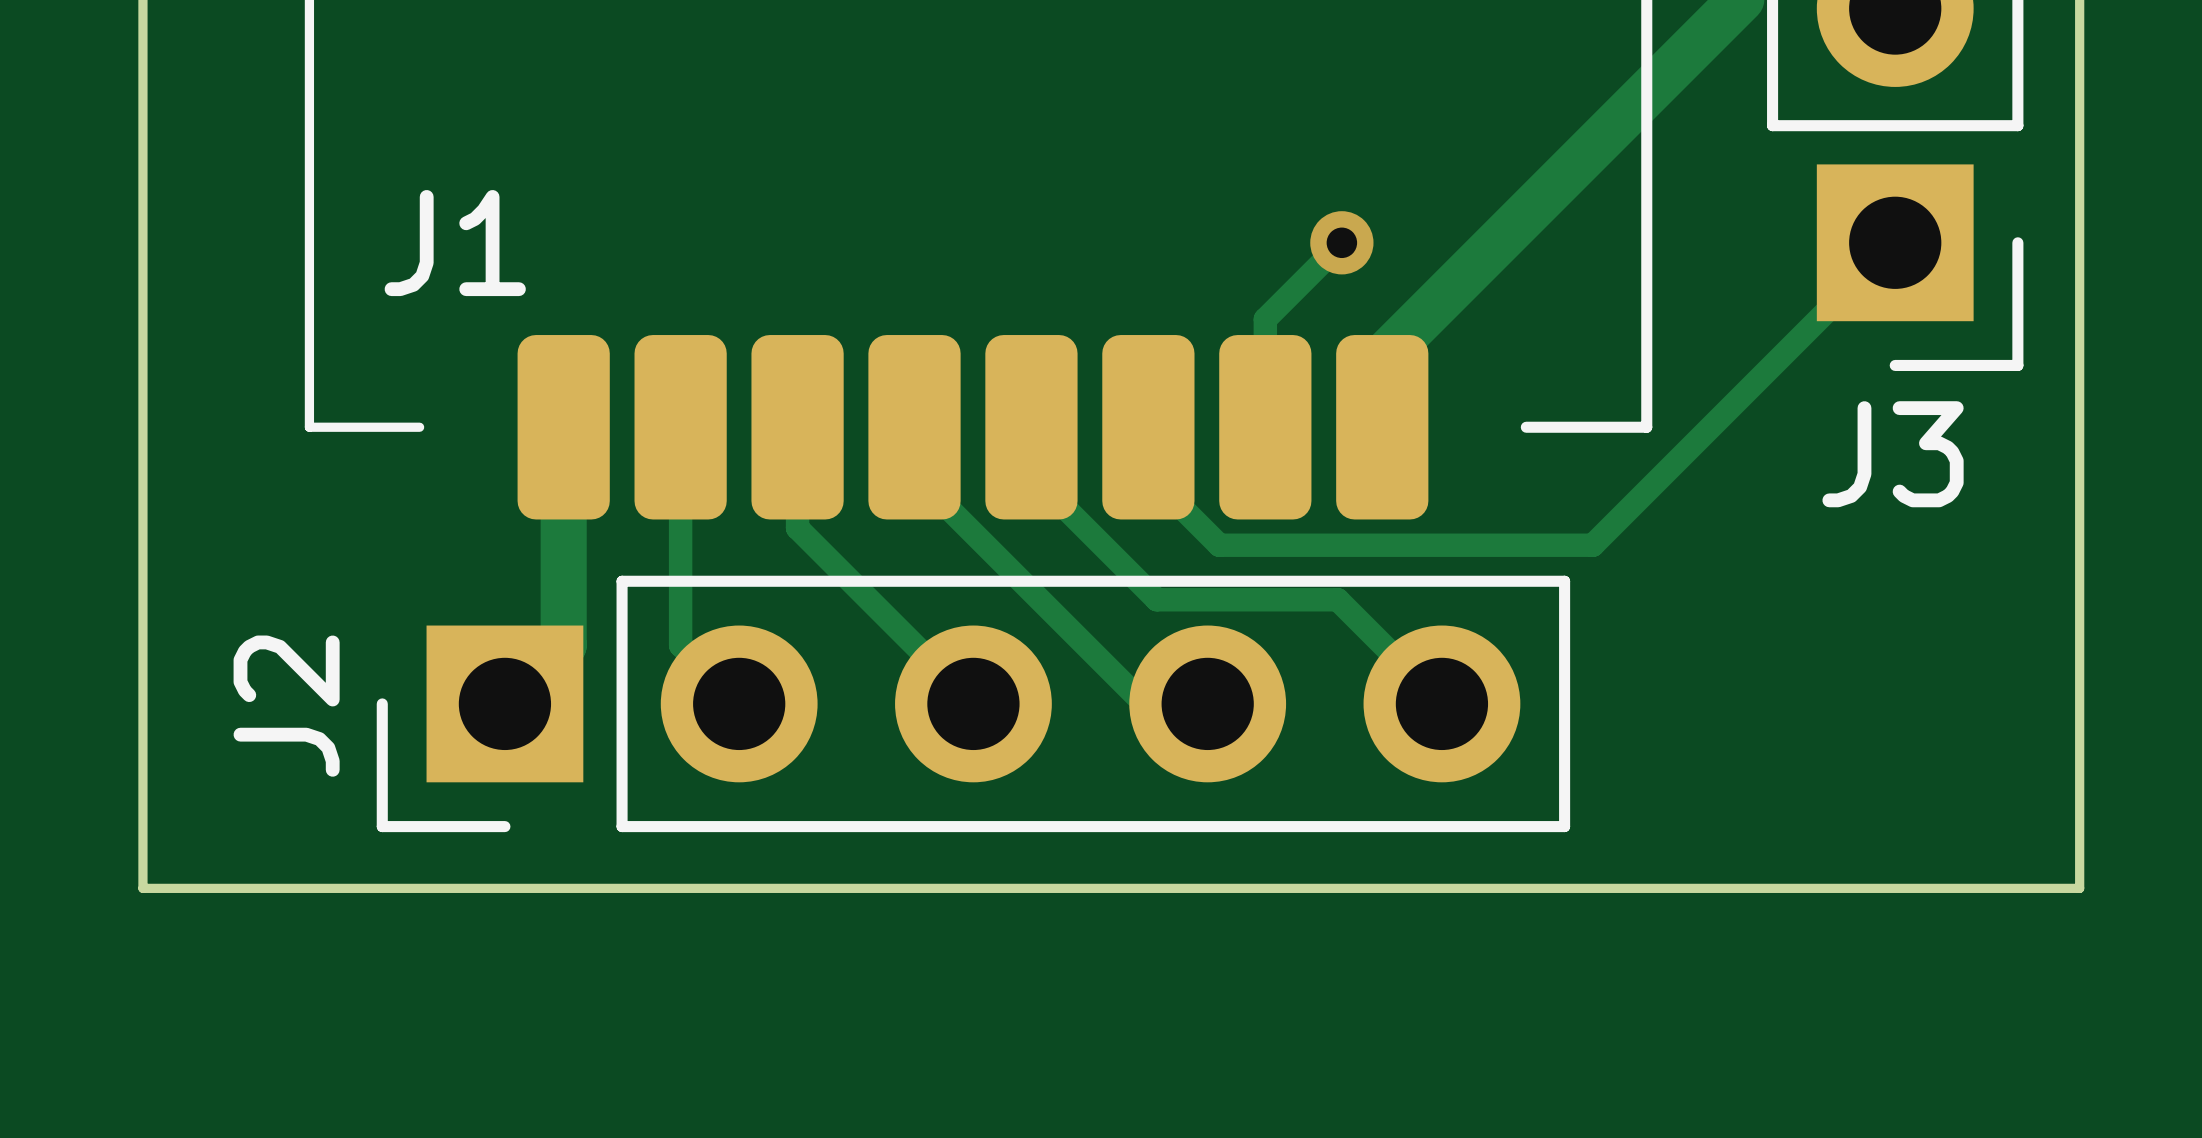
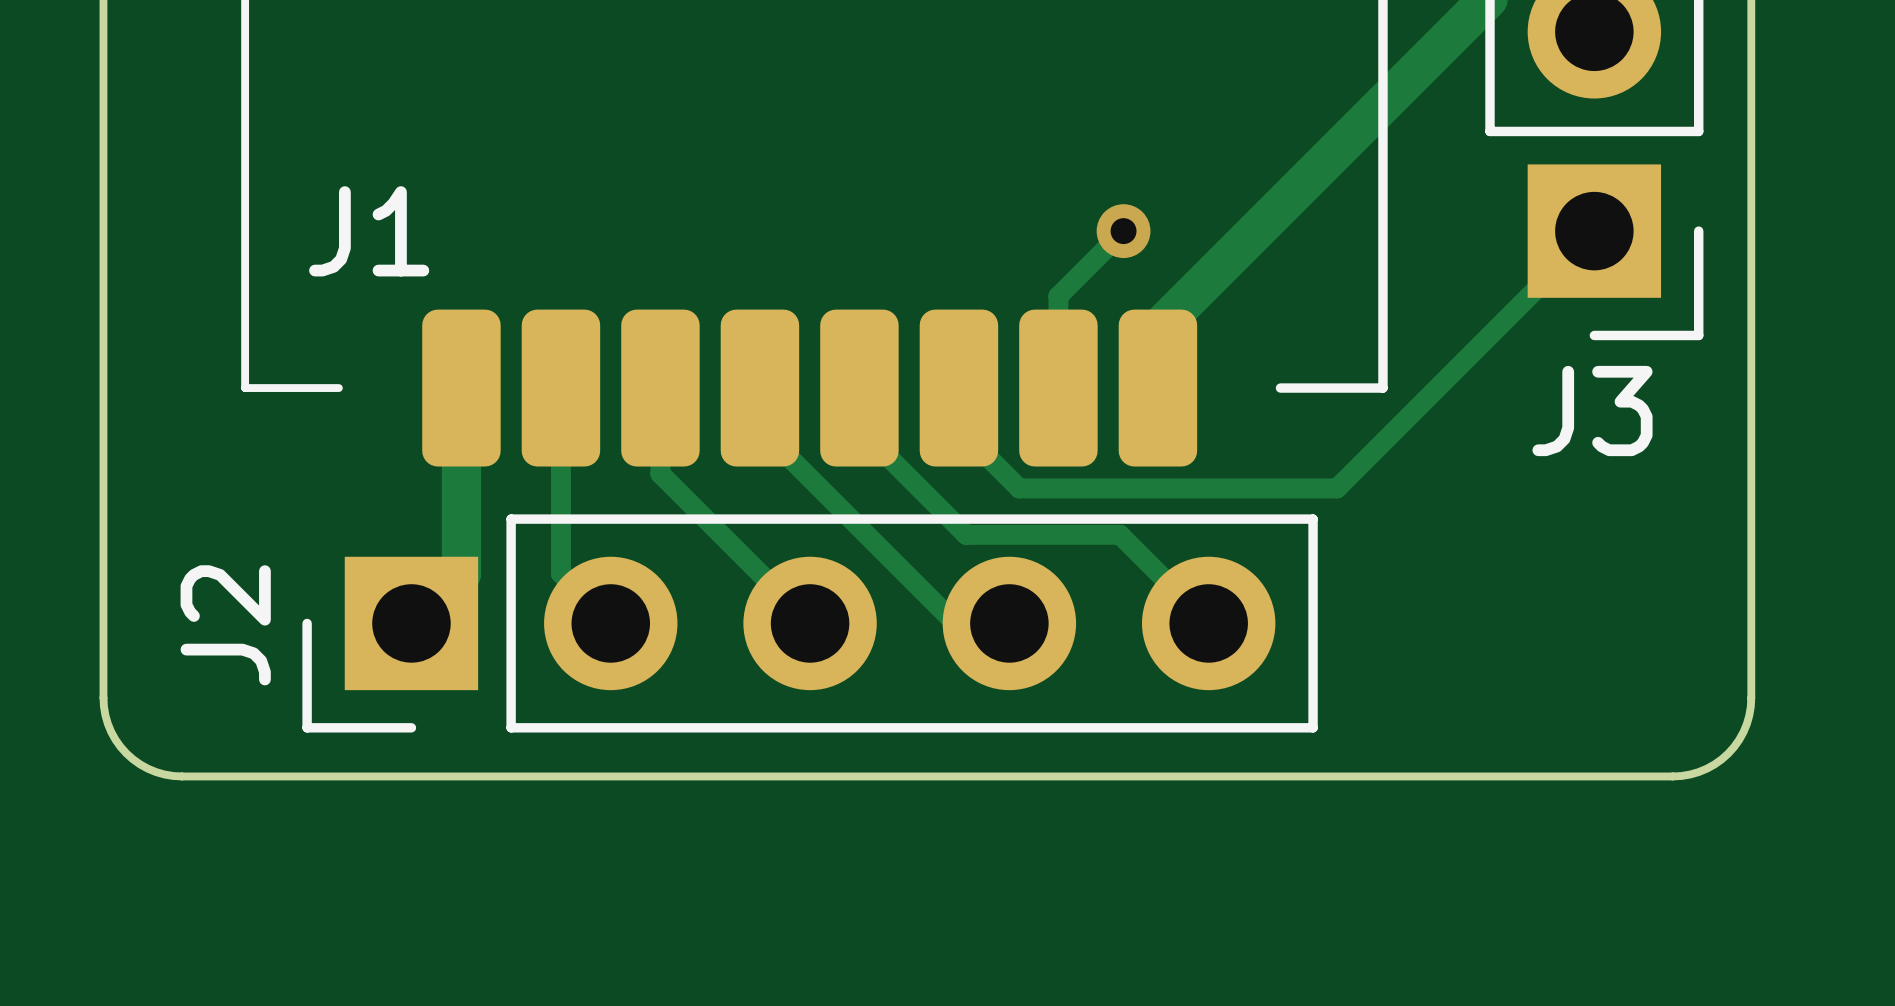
board edge: (142, 791) (142, 888) (2079, 888) (2079, 791) -> (103, 698) (105, 715) (111, 732) (126, 753) (147, 768) (164, 774) (181, 776) (1672, 776) (1690, 774) (1706, 768) (1728, 753) (1743, 732) (1749, 715) (1751, 698)

